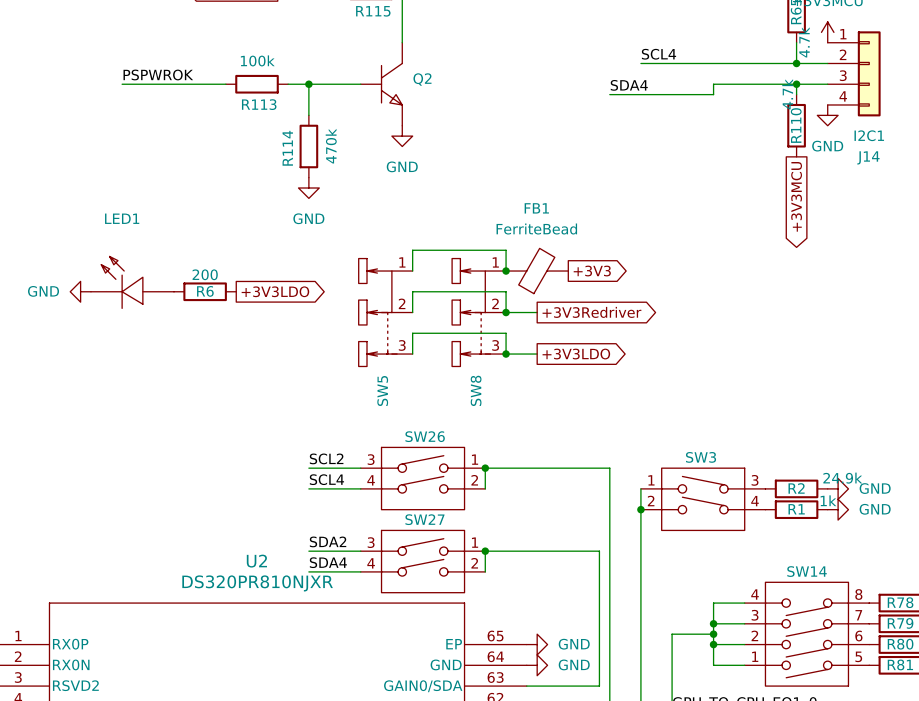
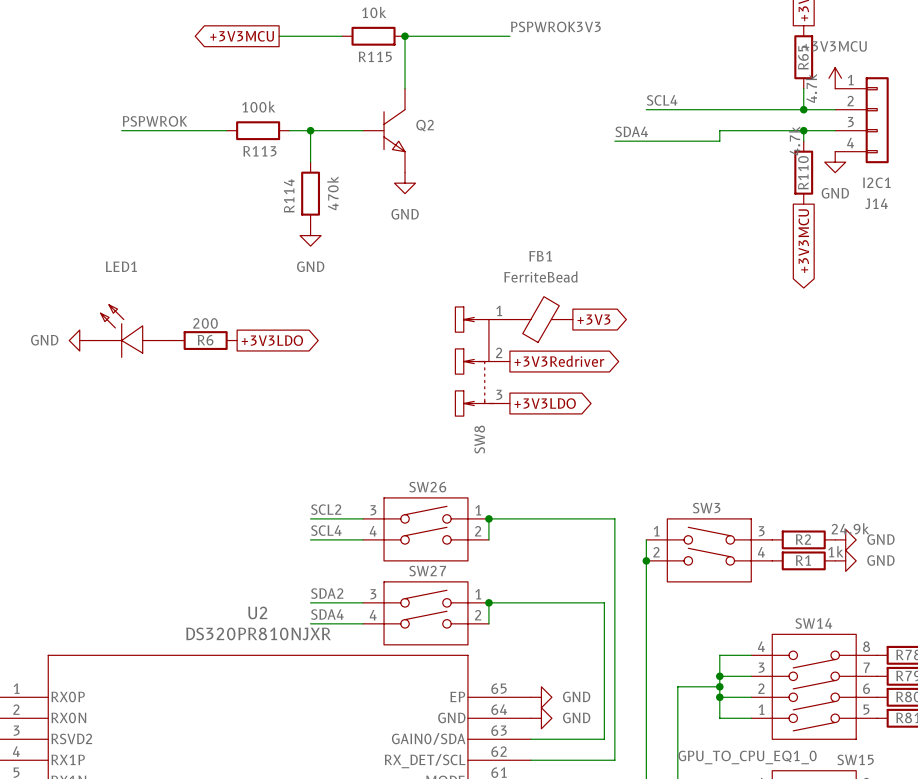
wire: (412, 271) (412, 250) (506, 250) (506, 271) -> none
junction: (506, 271) -> none
SW5: (385, 312) -> none
wire: (412, 312) (412, 291) (506, 291) (506, 312) (537, 312) -> none
junction: (506, 312) -> none
global label position: +3V3Redriver (591, 312) -> +3V3Redriver (559, 361)
wire: (412, 354) (412, 333) (506, 333) (506, 354) (537, 354) -> none
junction: (506, 354) -> none
global label position: +3V3LDO (576, 354) -> +3V3LDO (545, 403)

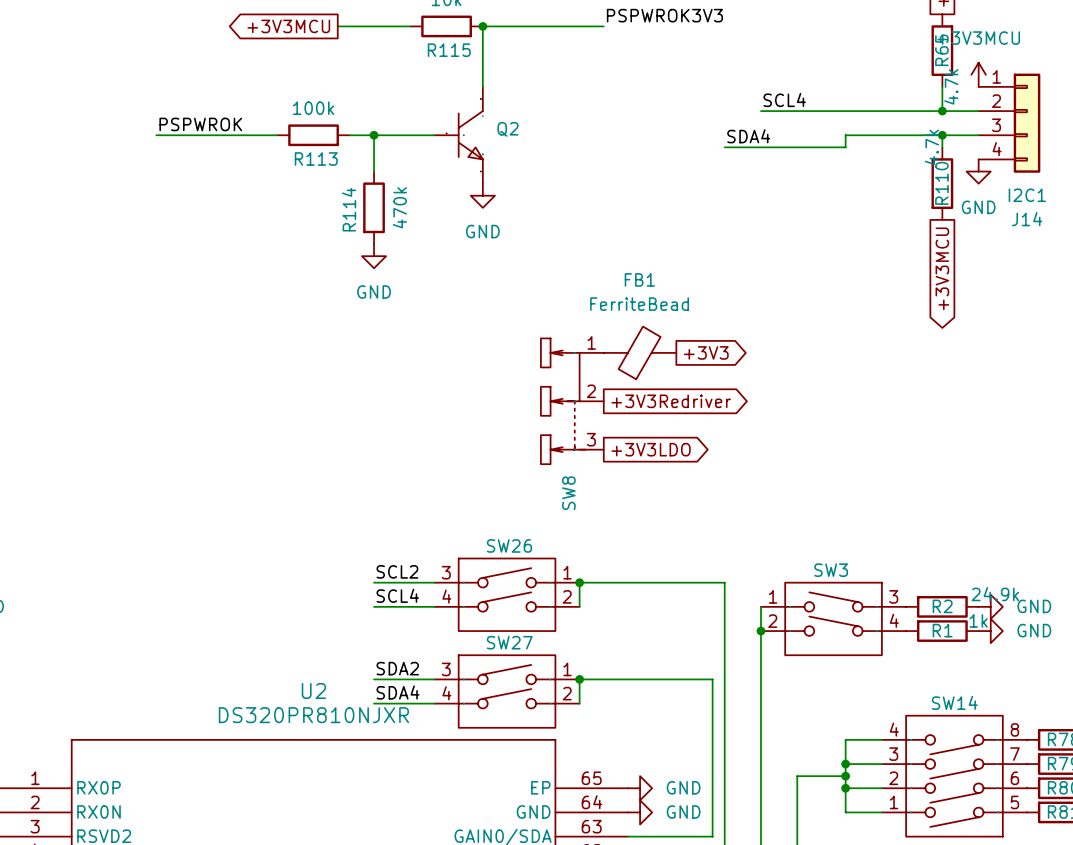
LED1: (132, 331) -> none
power symbol: GND (79, 340) -> none
R6: 200 (205, 340) -> none
global label: +3V3LDO (272, 340) -> none

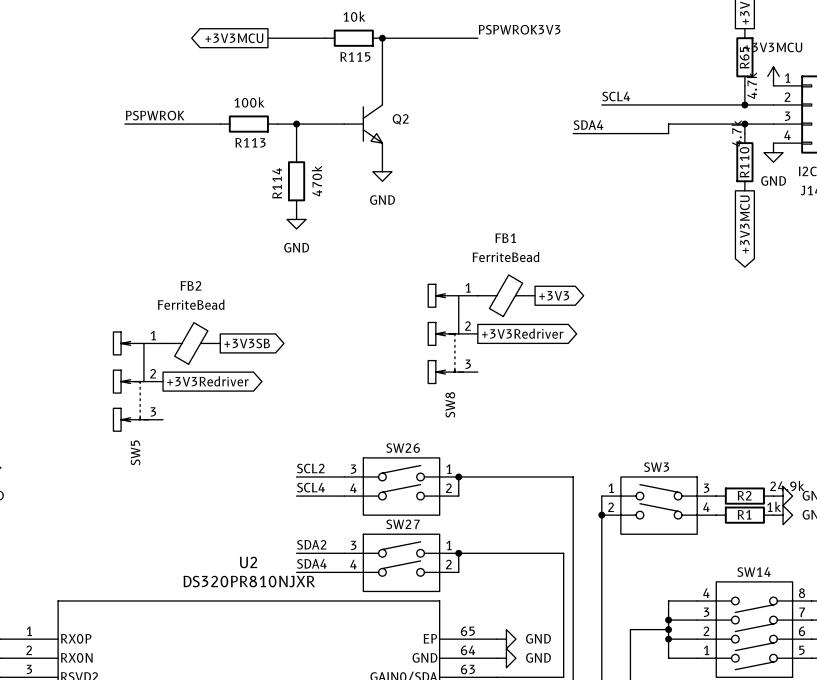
FB2: none -> FerriteBead (191, 343)
global label: none -> +3V3SB (247, 343)
global label: +3V3LDO (651, 449) -> none
SW5: none -> (138, 381)
global label: none -> +3V3Redriver (208, 381)

